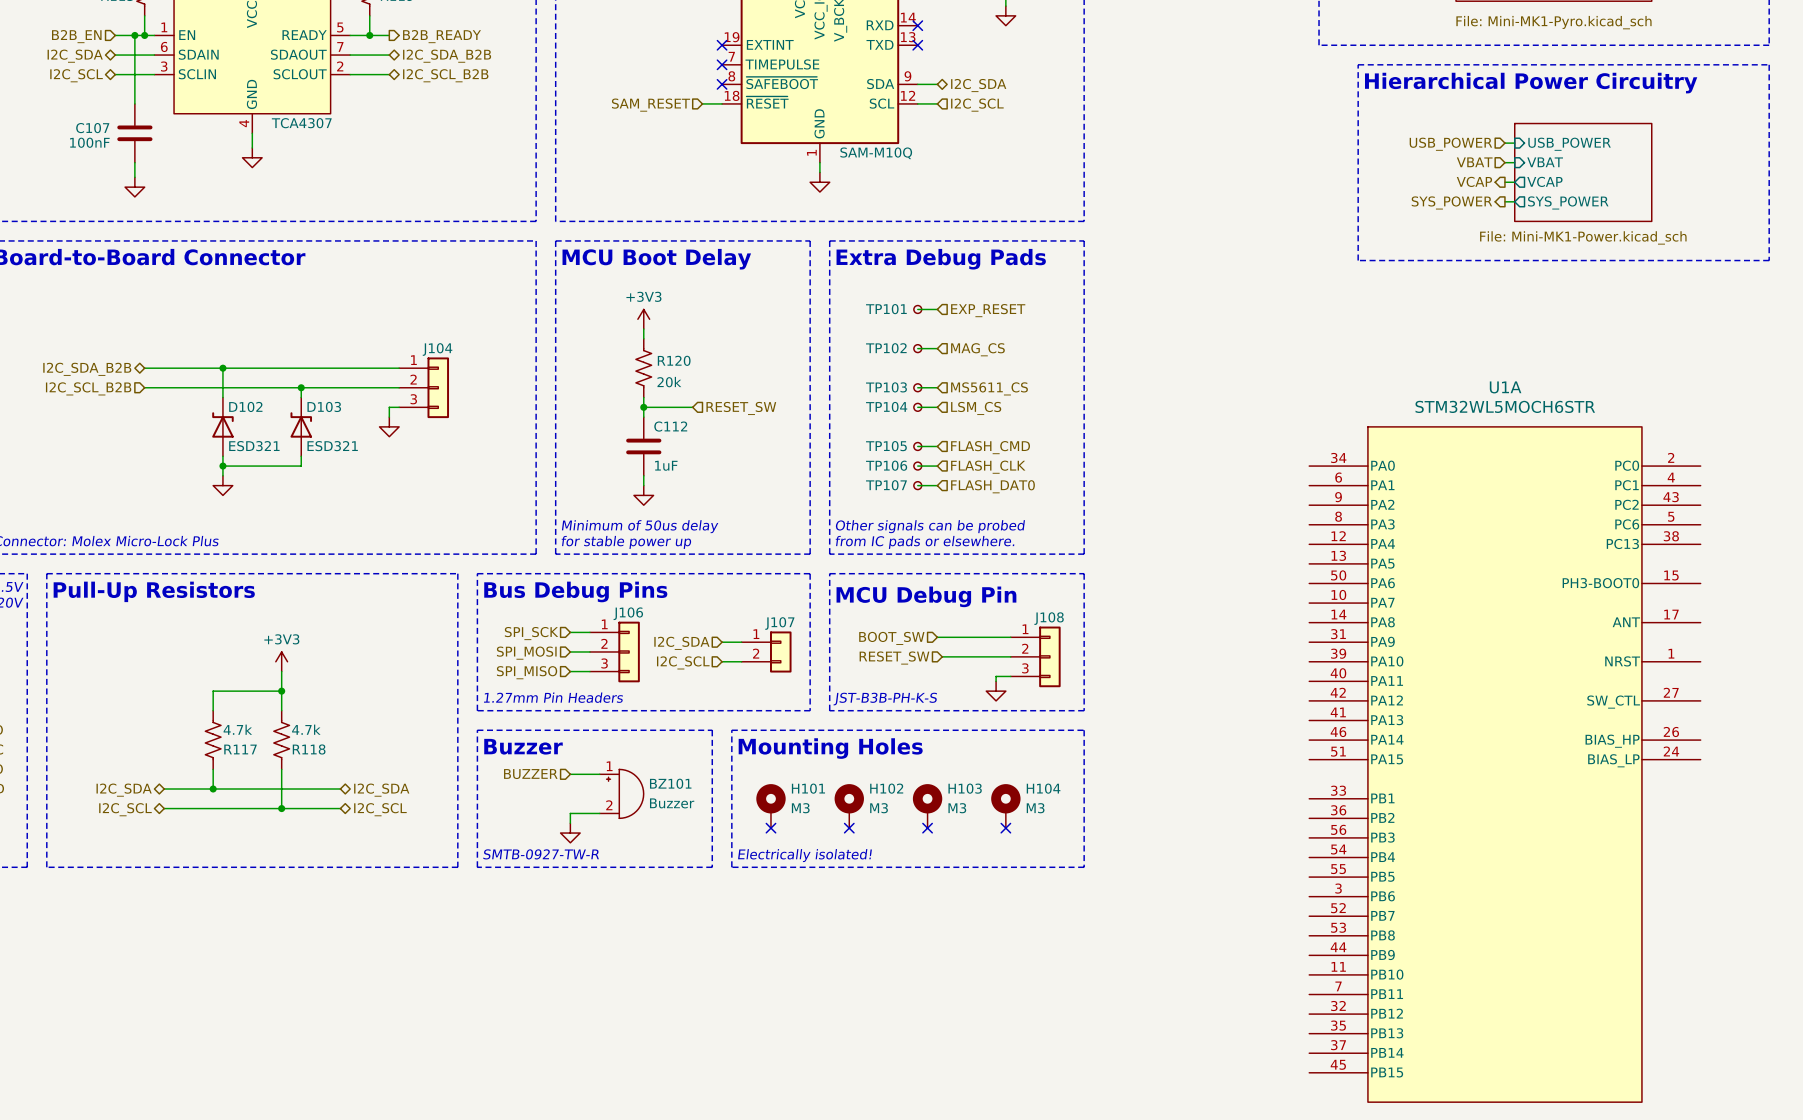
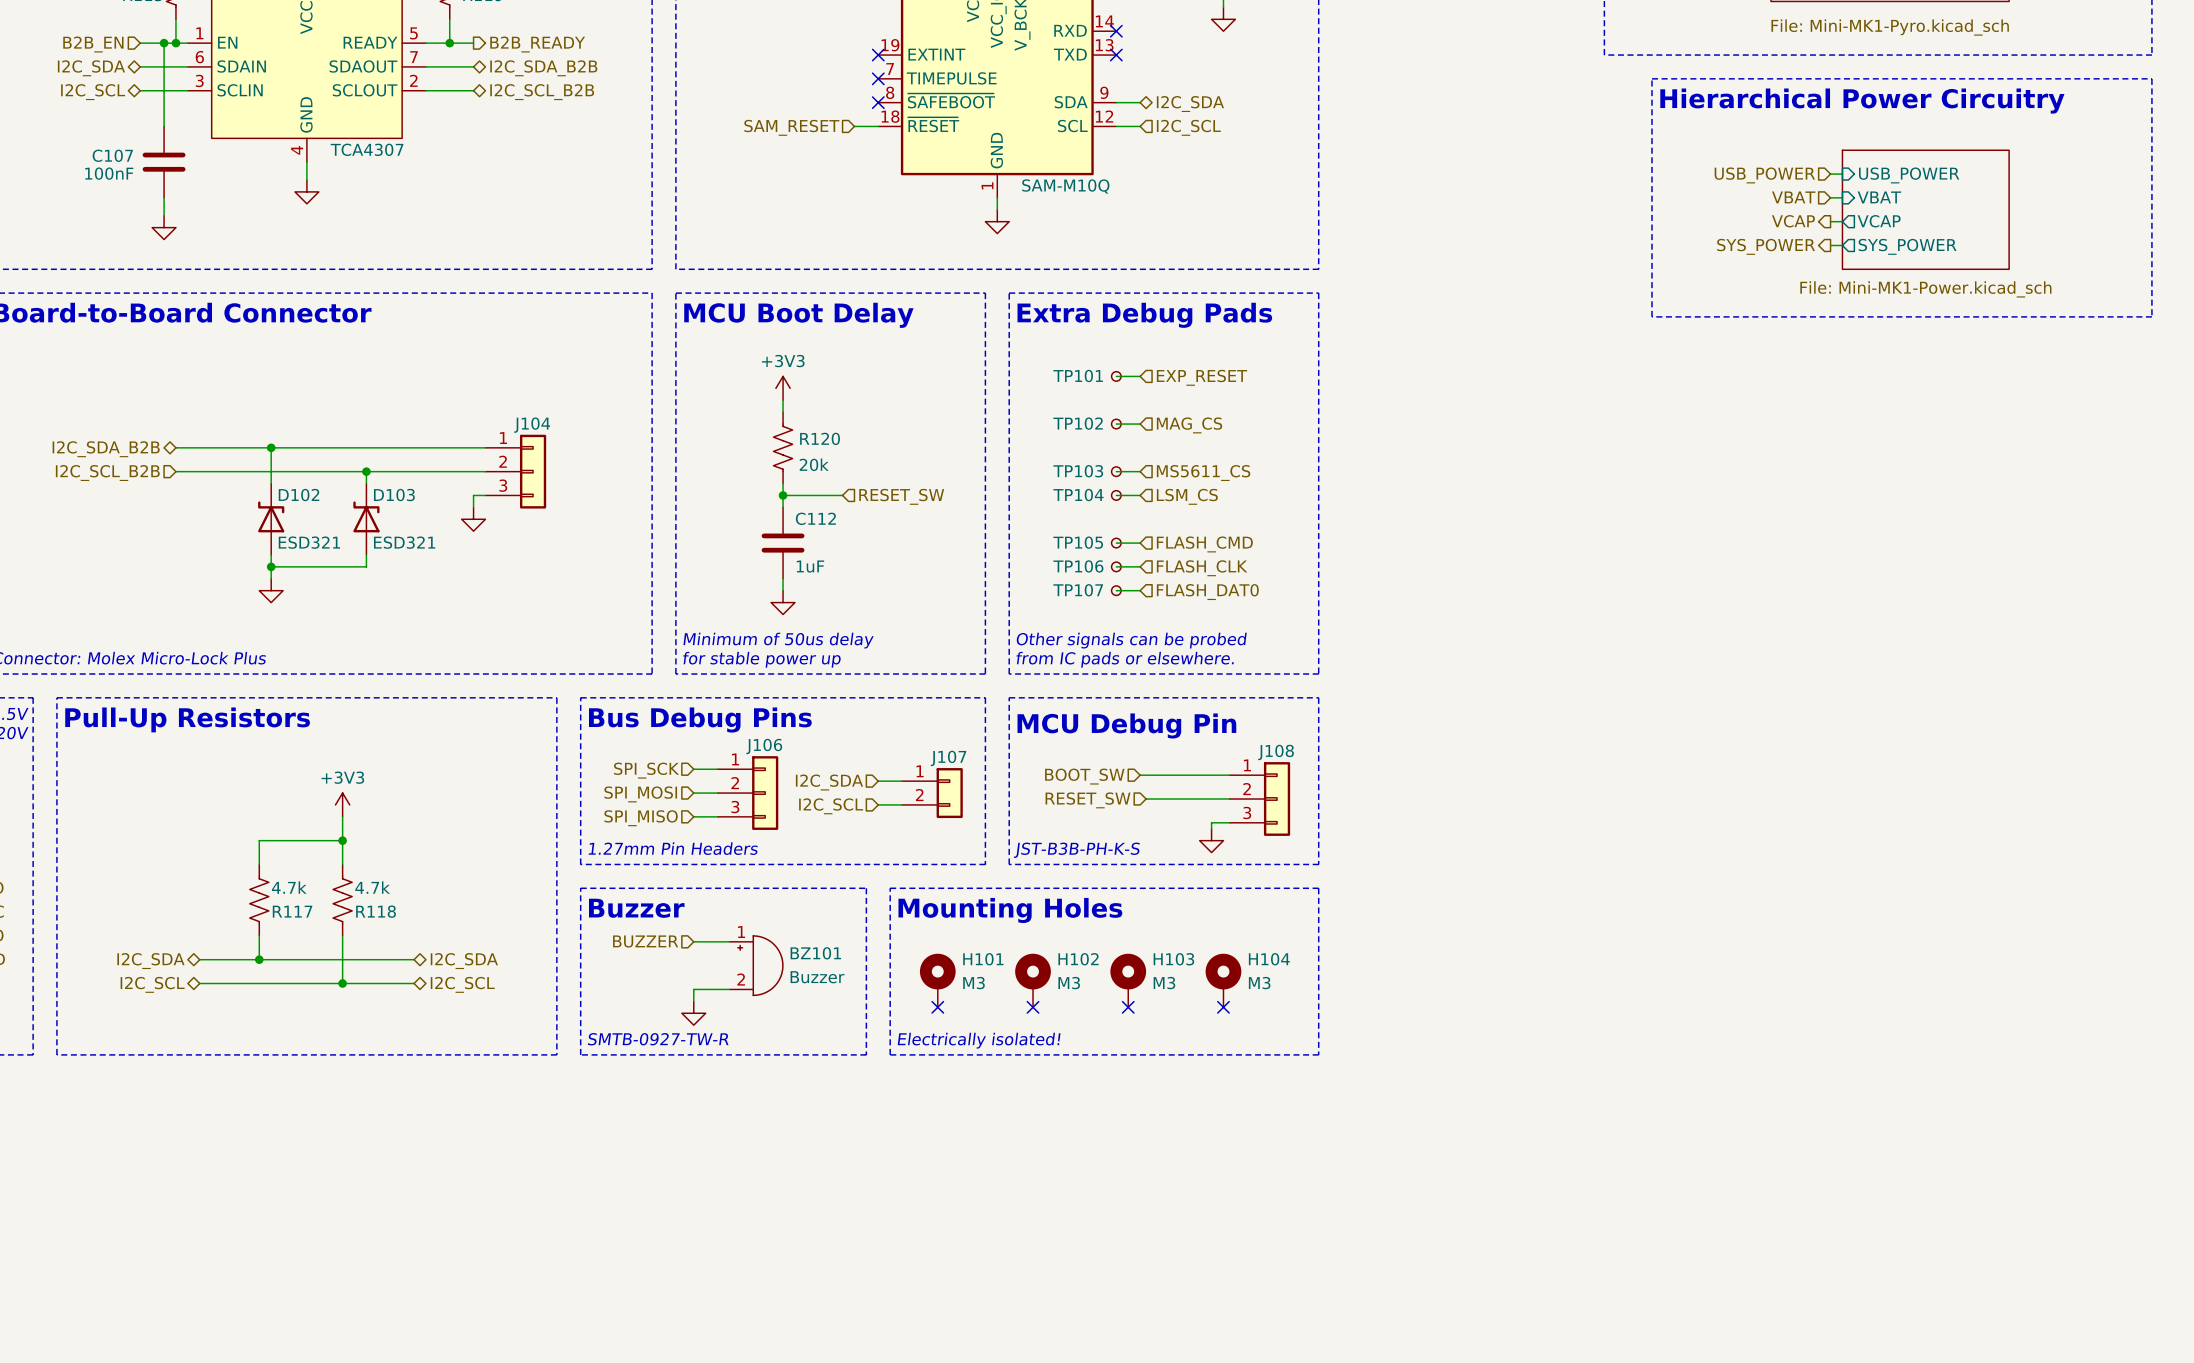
U1A: STM32WL5MOCH6STR (1504, 764) -> none

